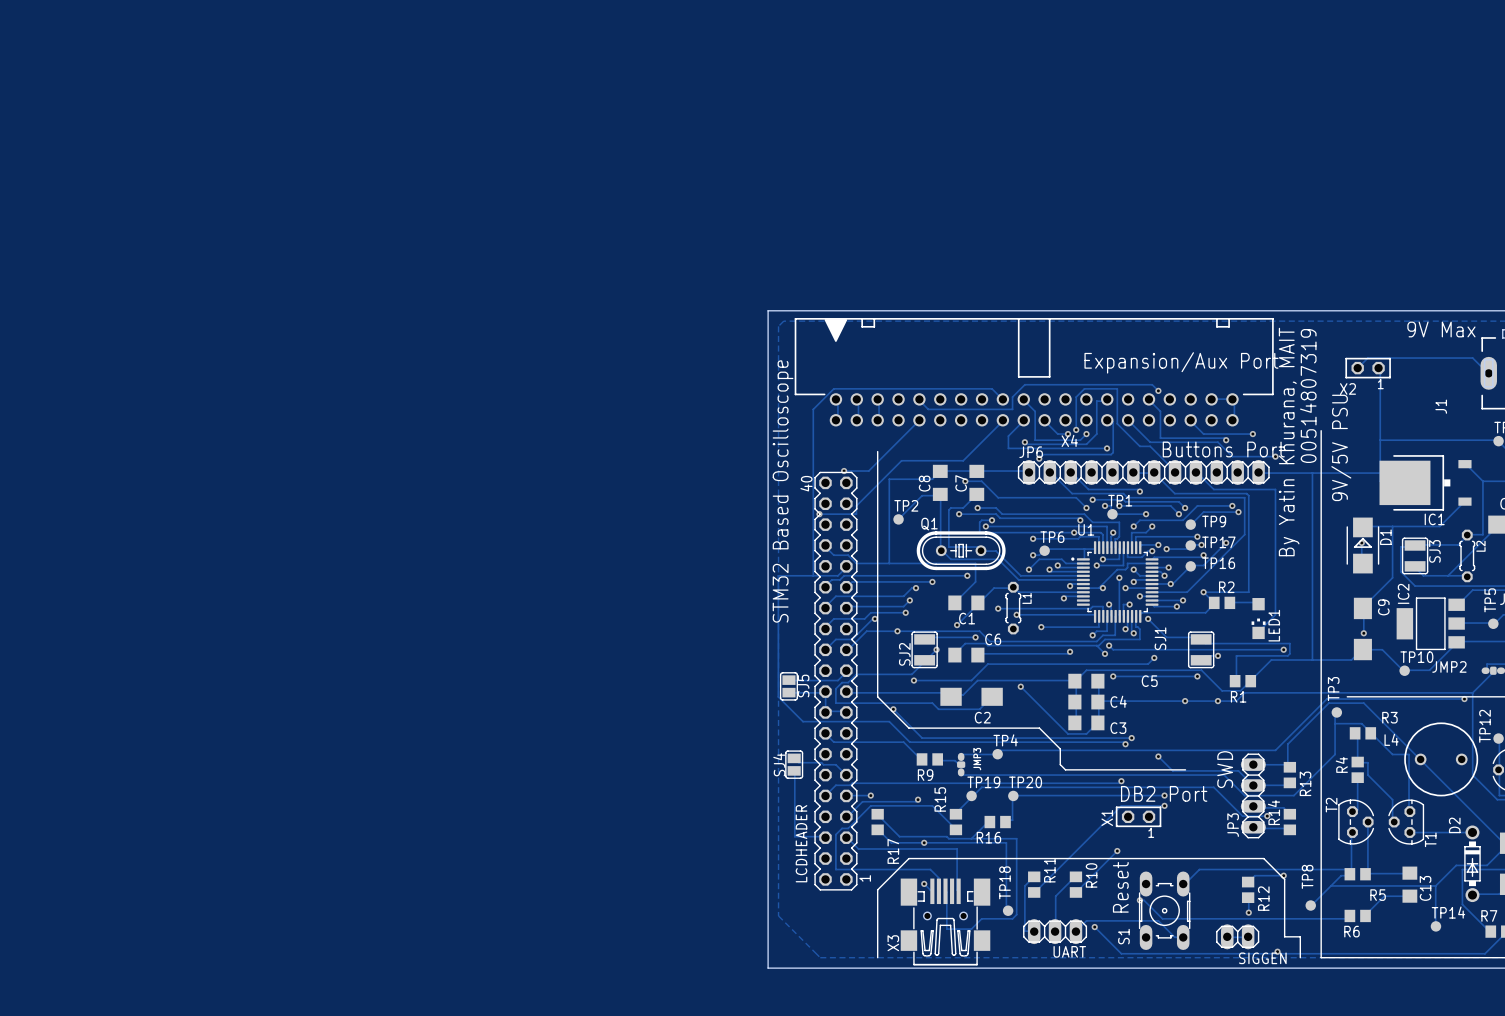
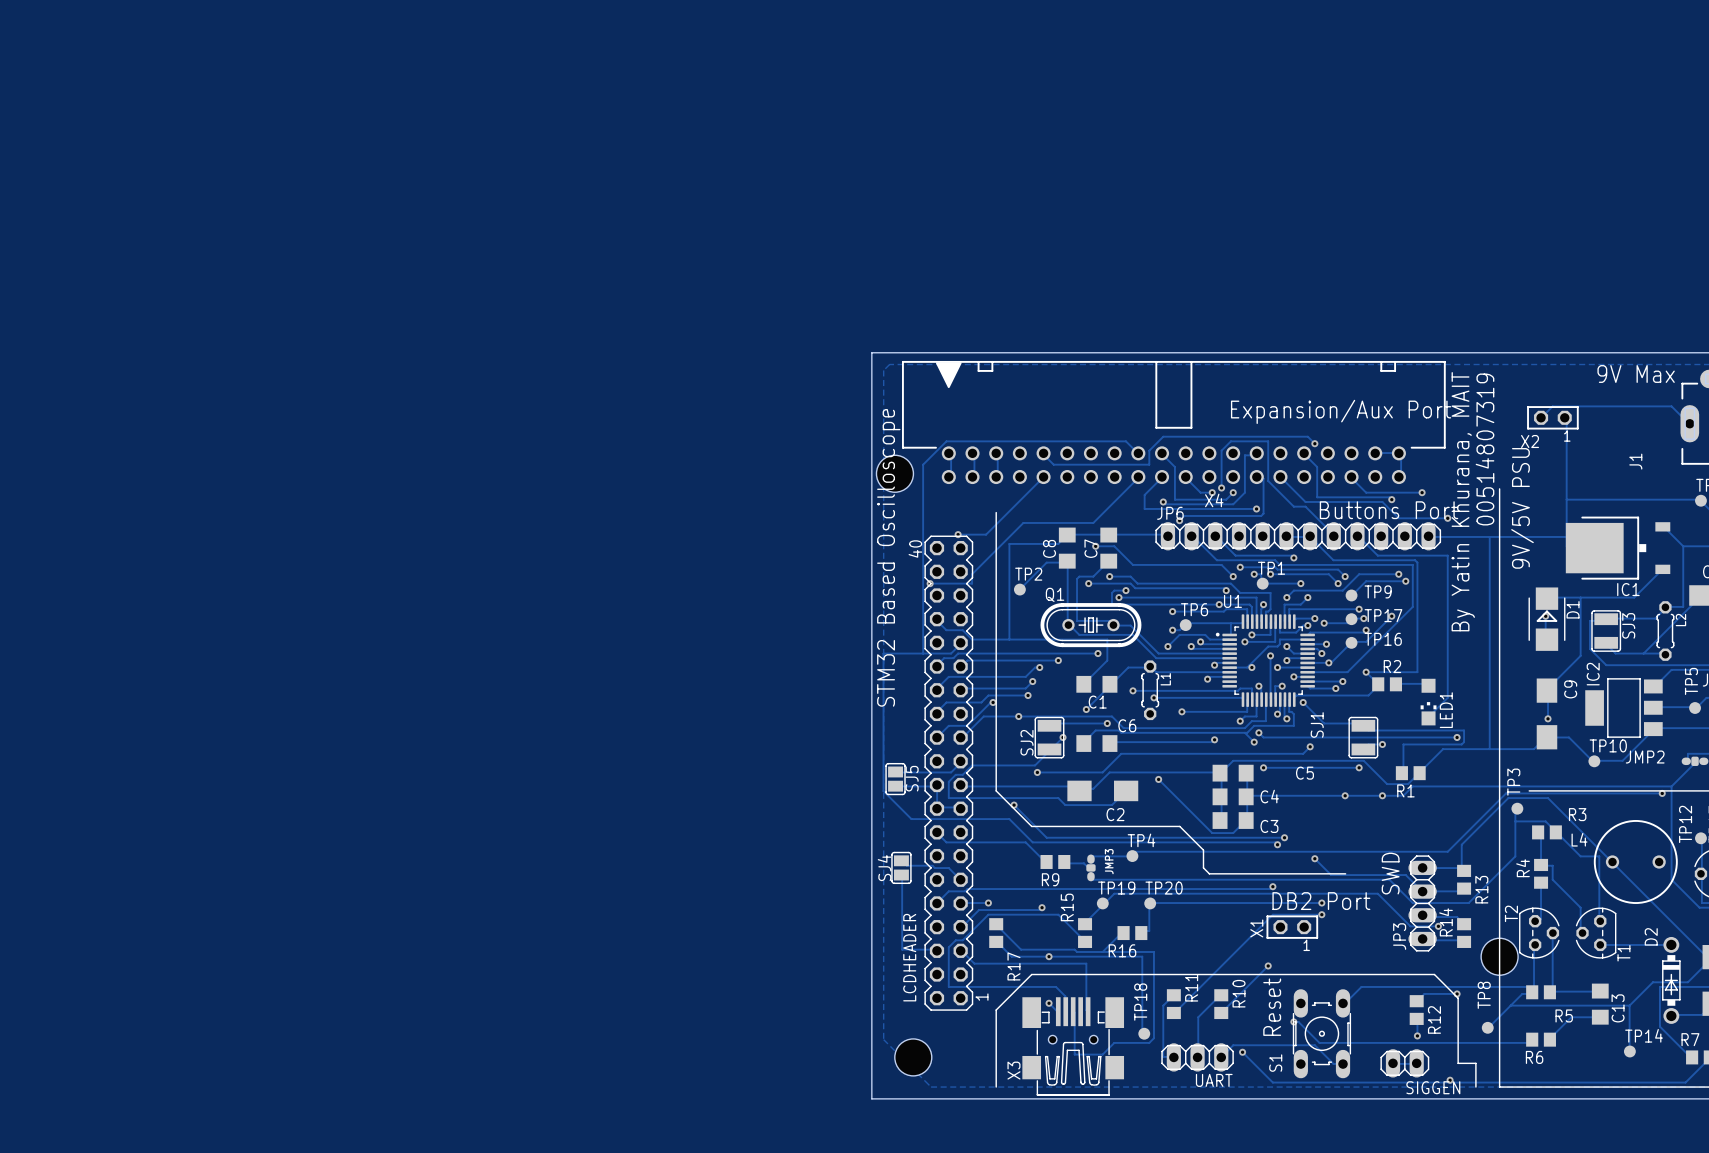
part: none -> (894, 473)
part: none -> (1499, 956)
part: none -> (913, 1057)

